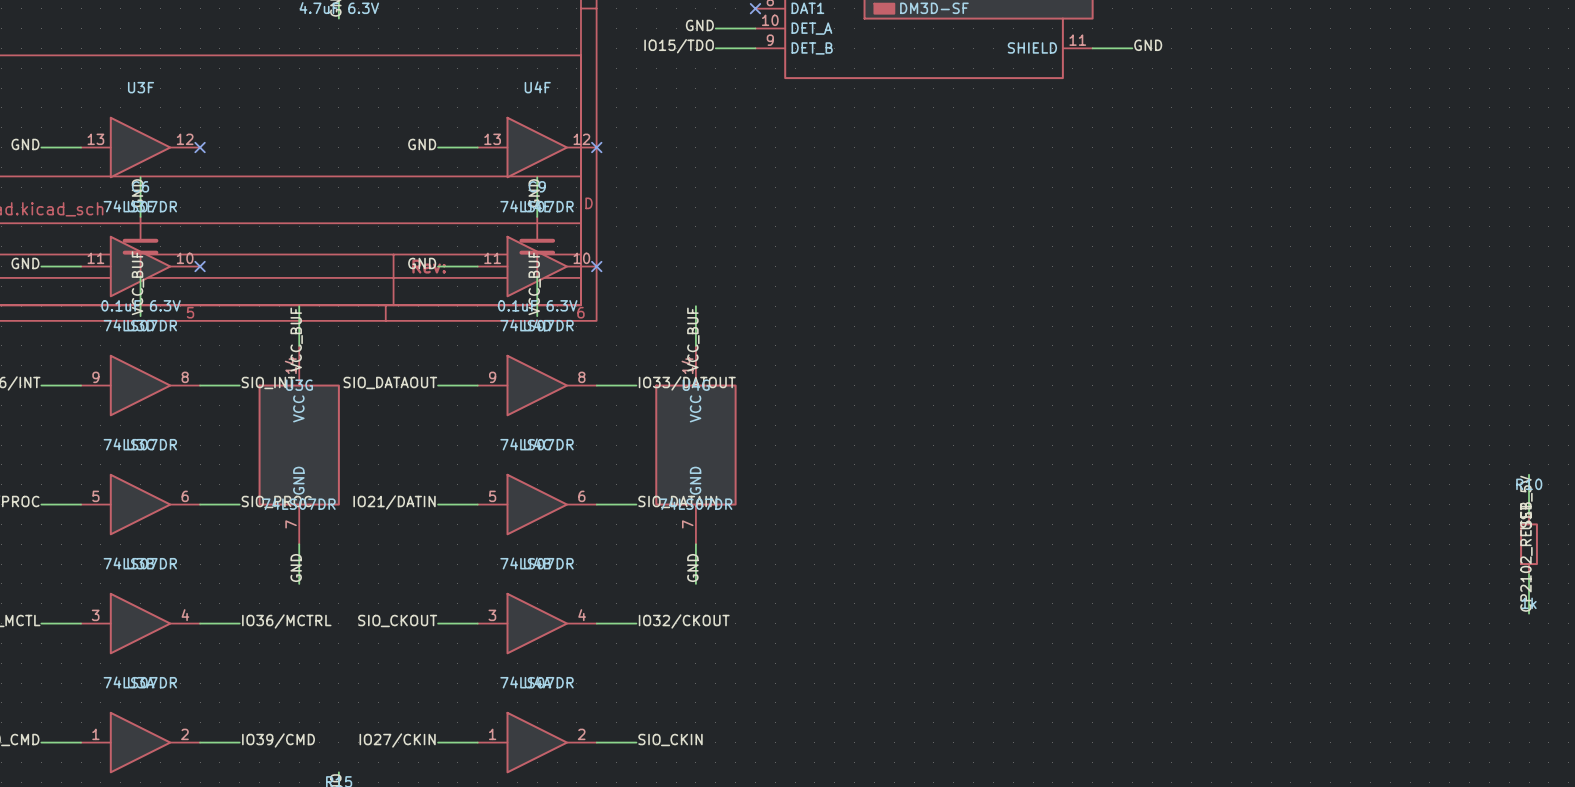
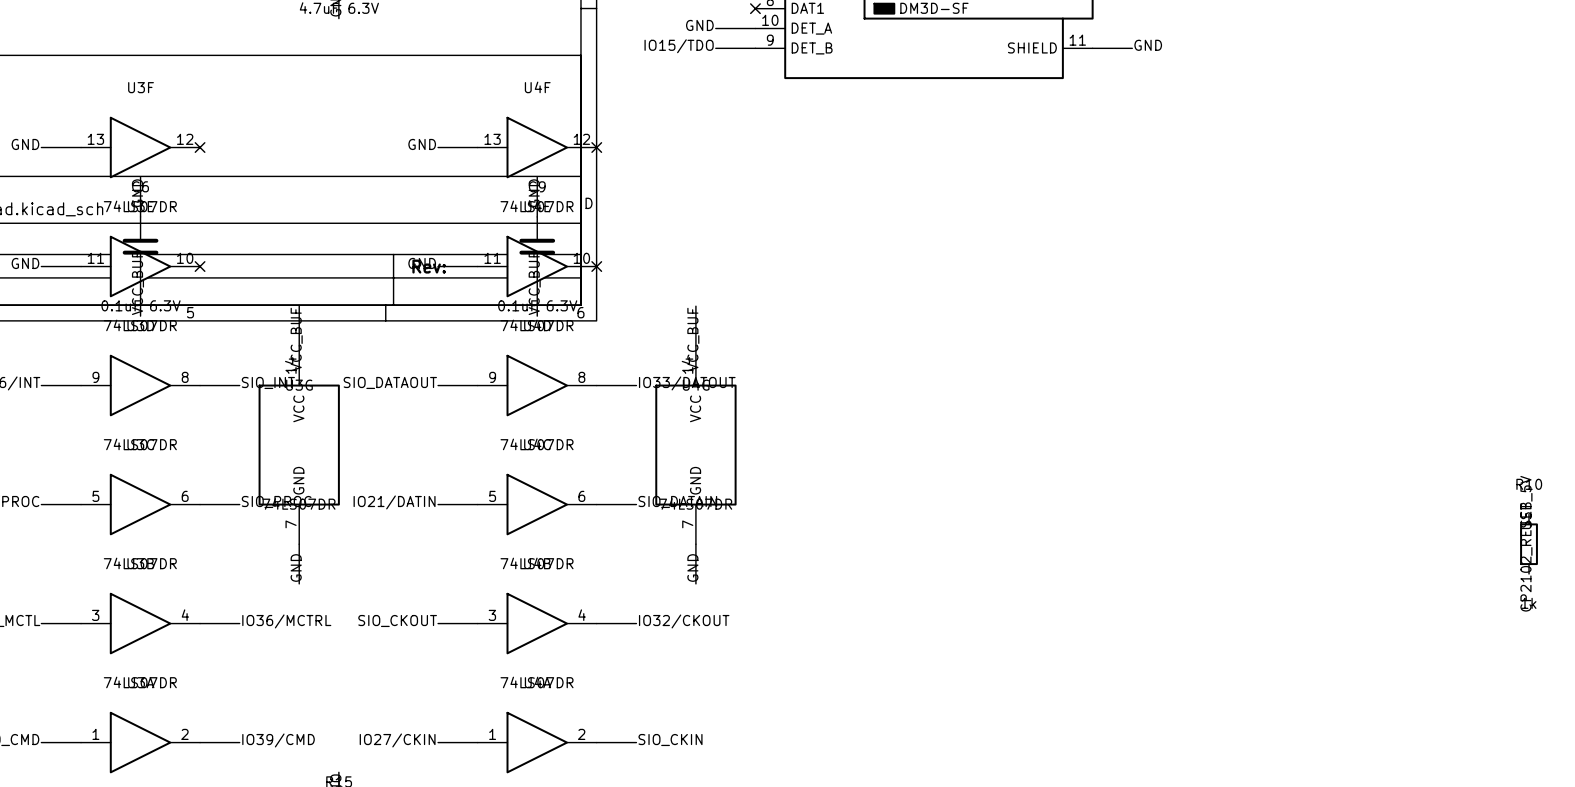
wire: (1529, 474) (1529, 514) -> none
wire: (1529, 573) (1529, 613) -> none

